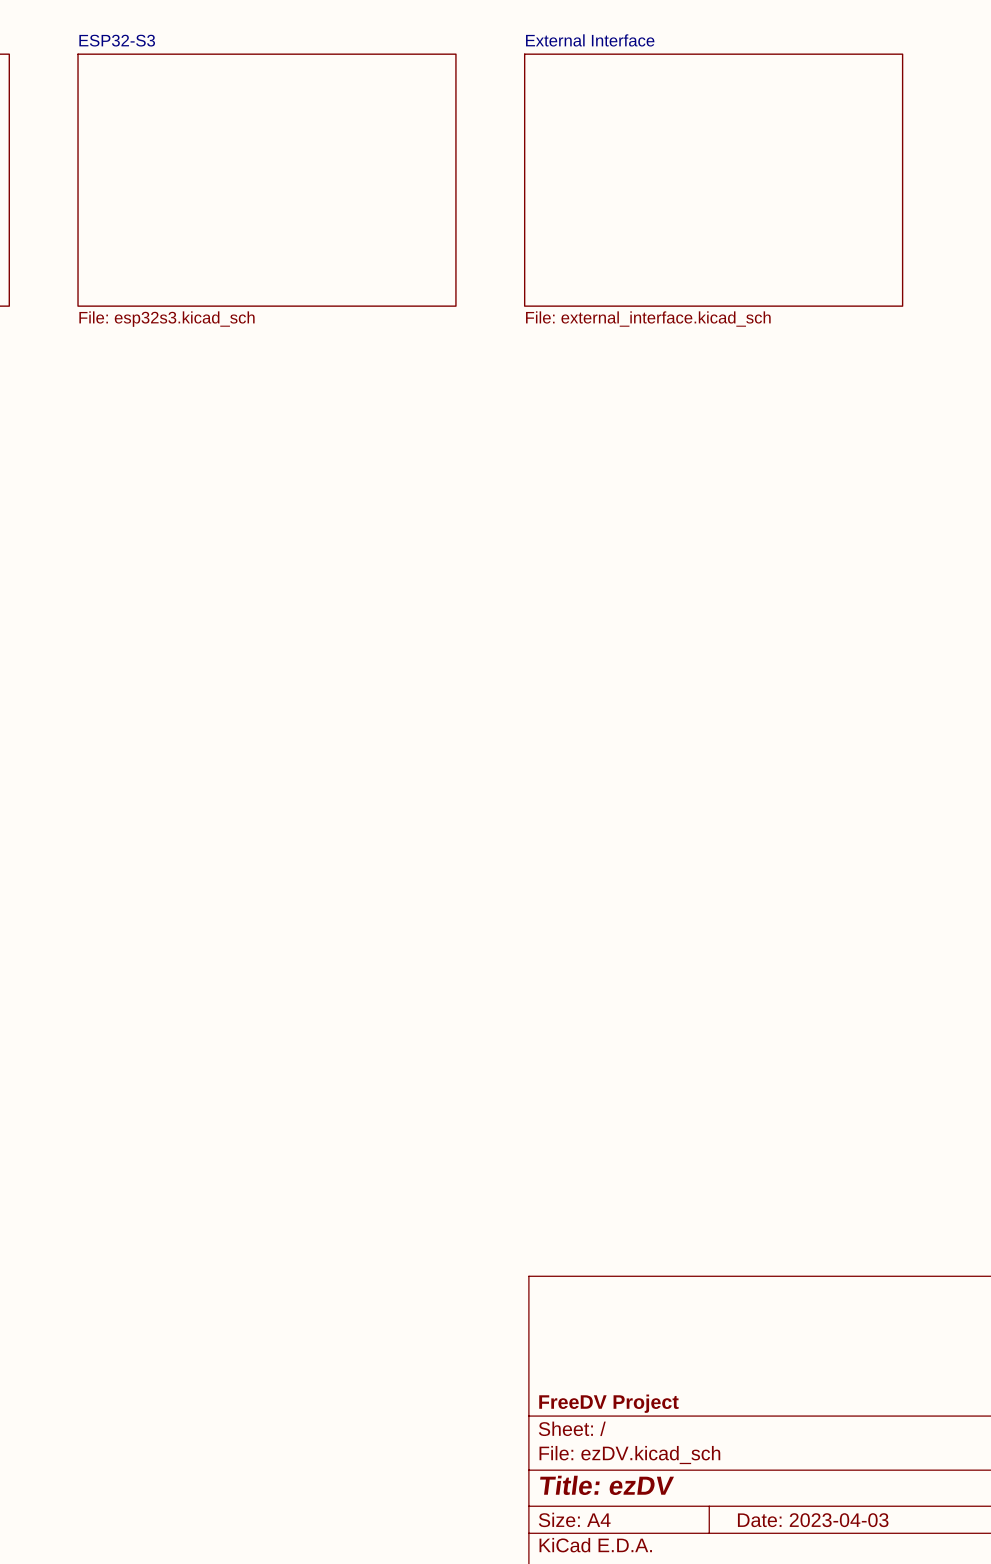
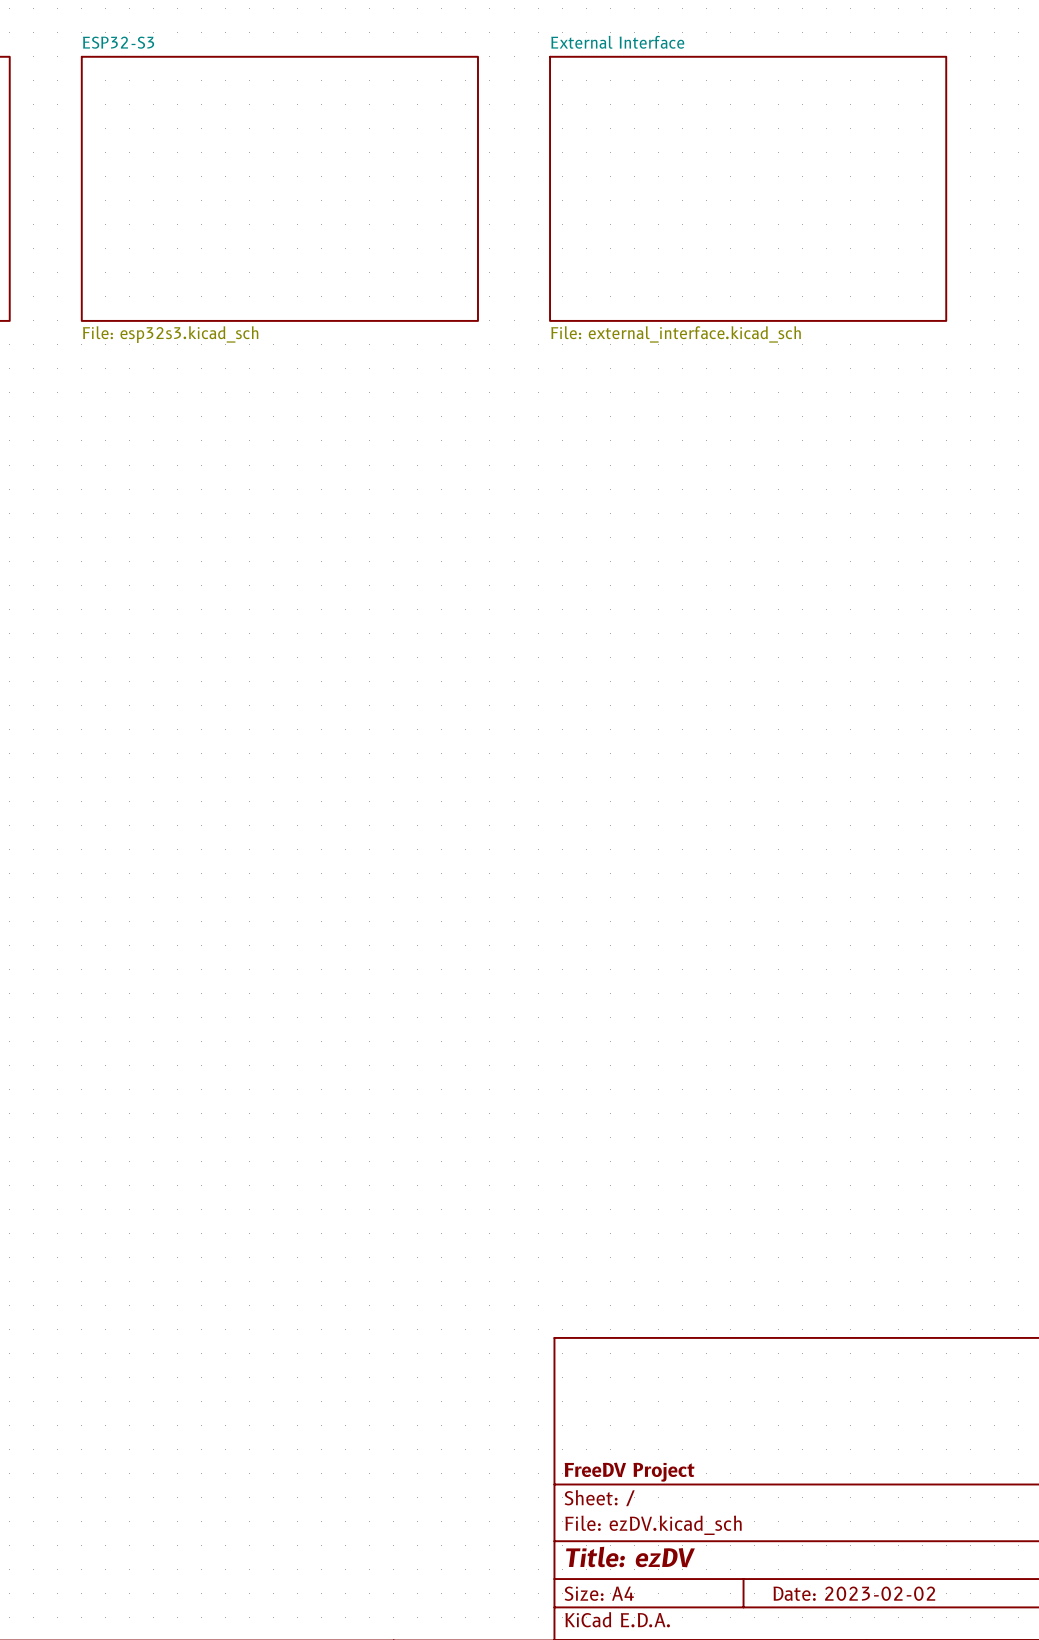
title block: Date: 2023-04-03 (813, 1520) -> Date: 2023-02-02 (854, 1593)

